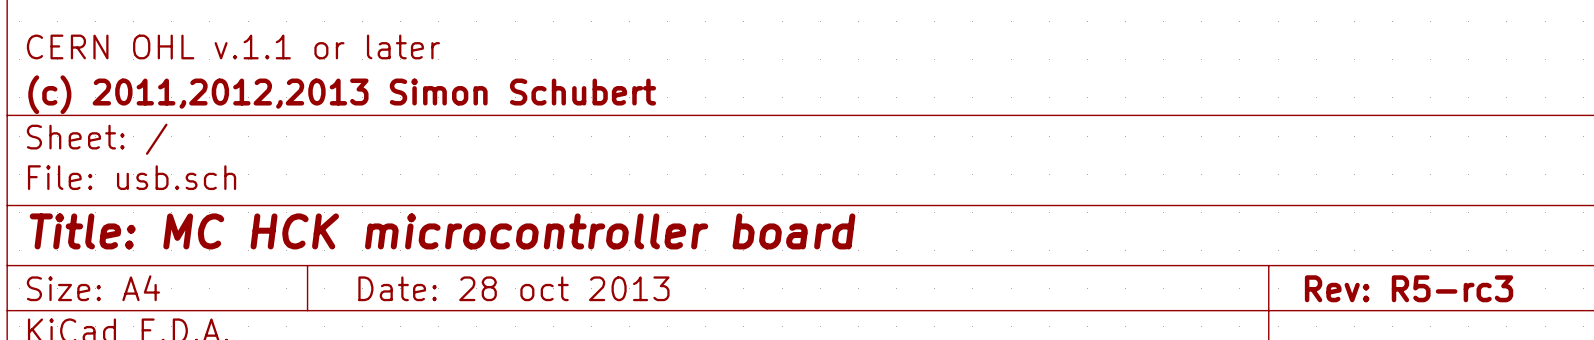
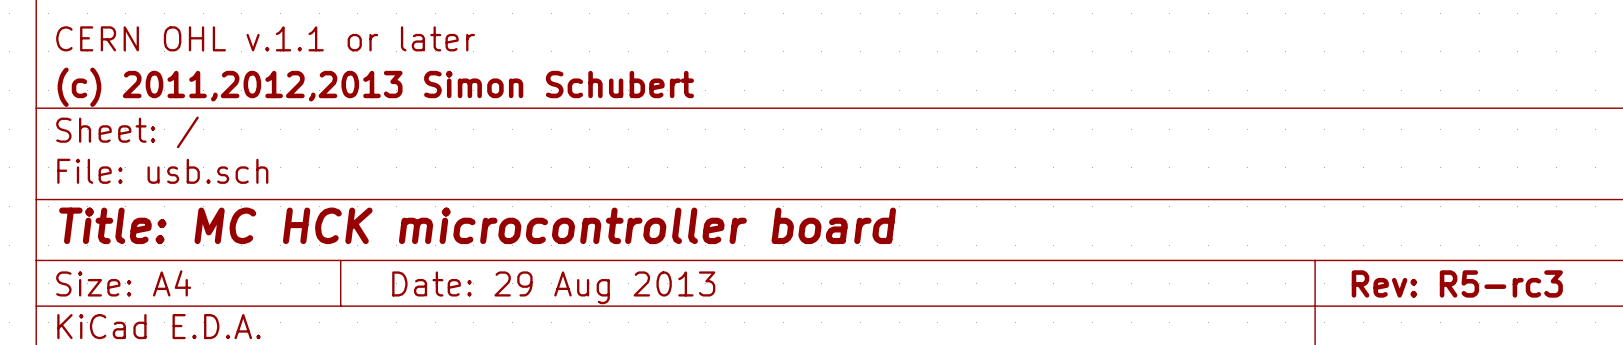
title block: Date: 28 oct 2013 (513, 288) -> Date: 29 Aug 2013 (553, 287)

